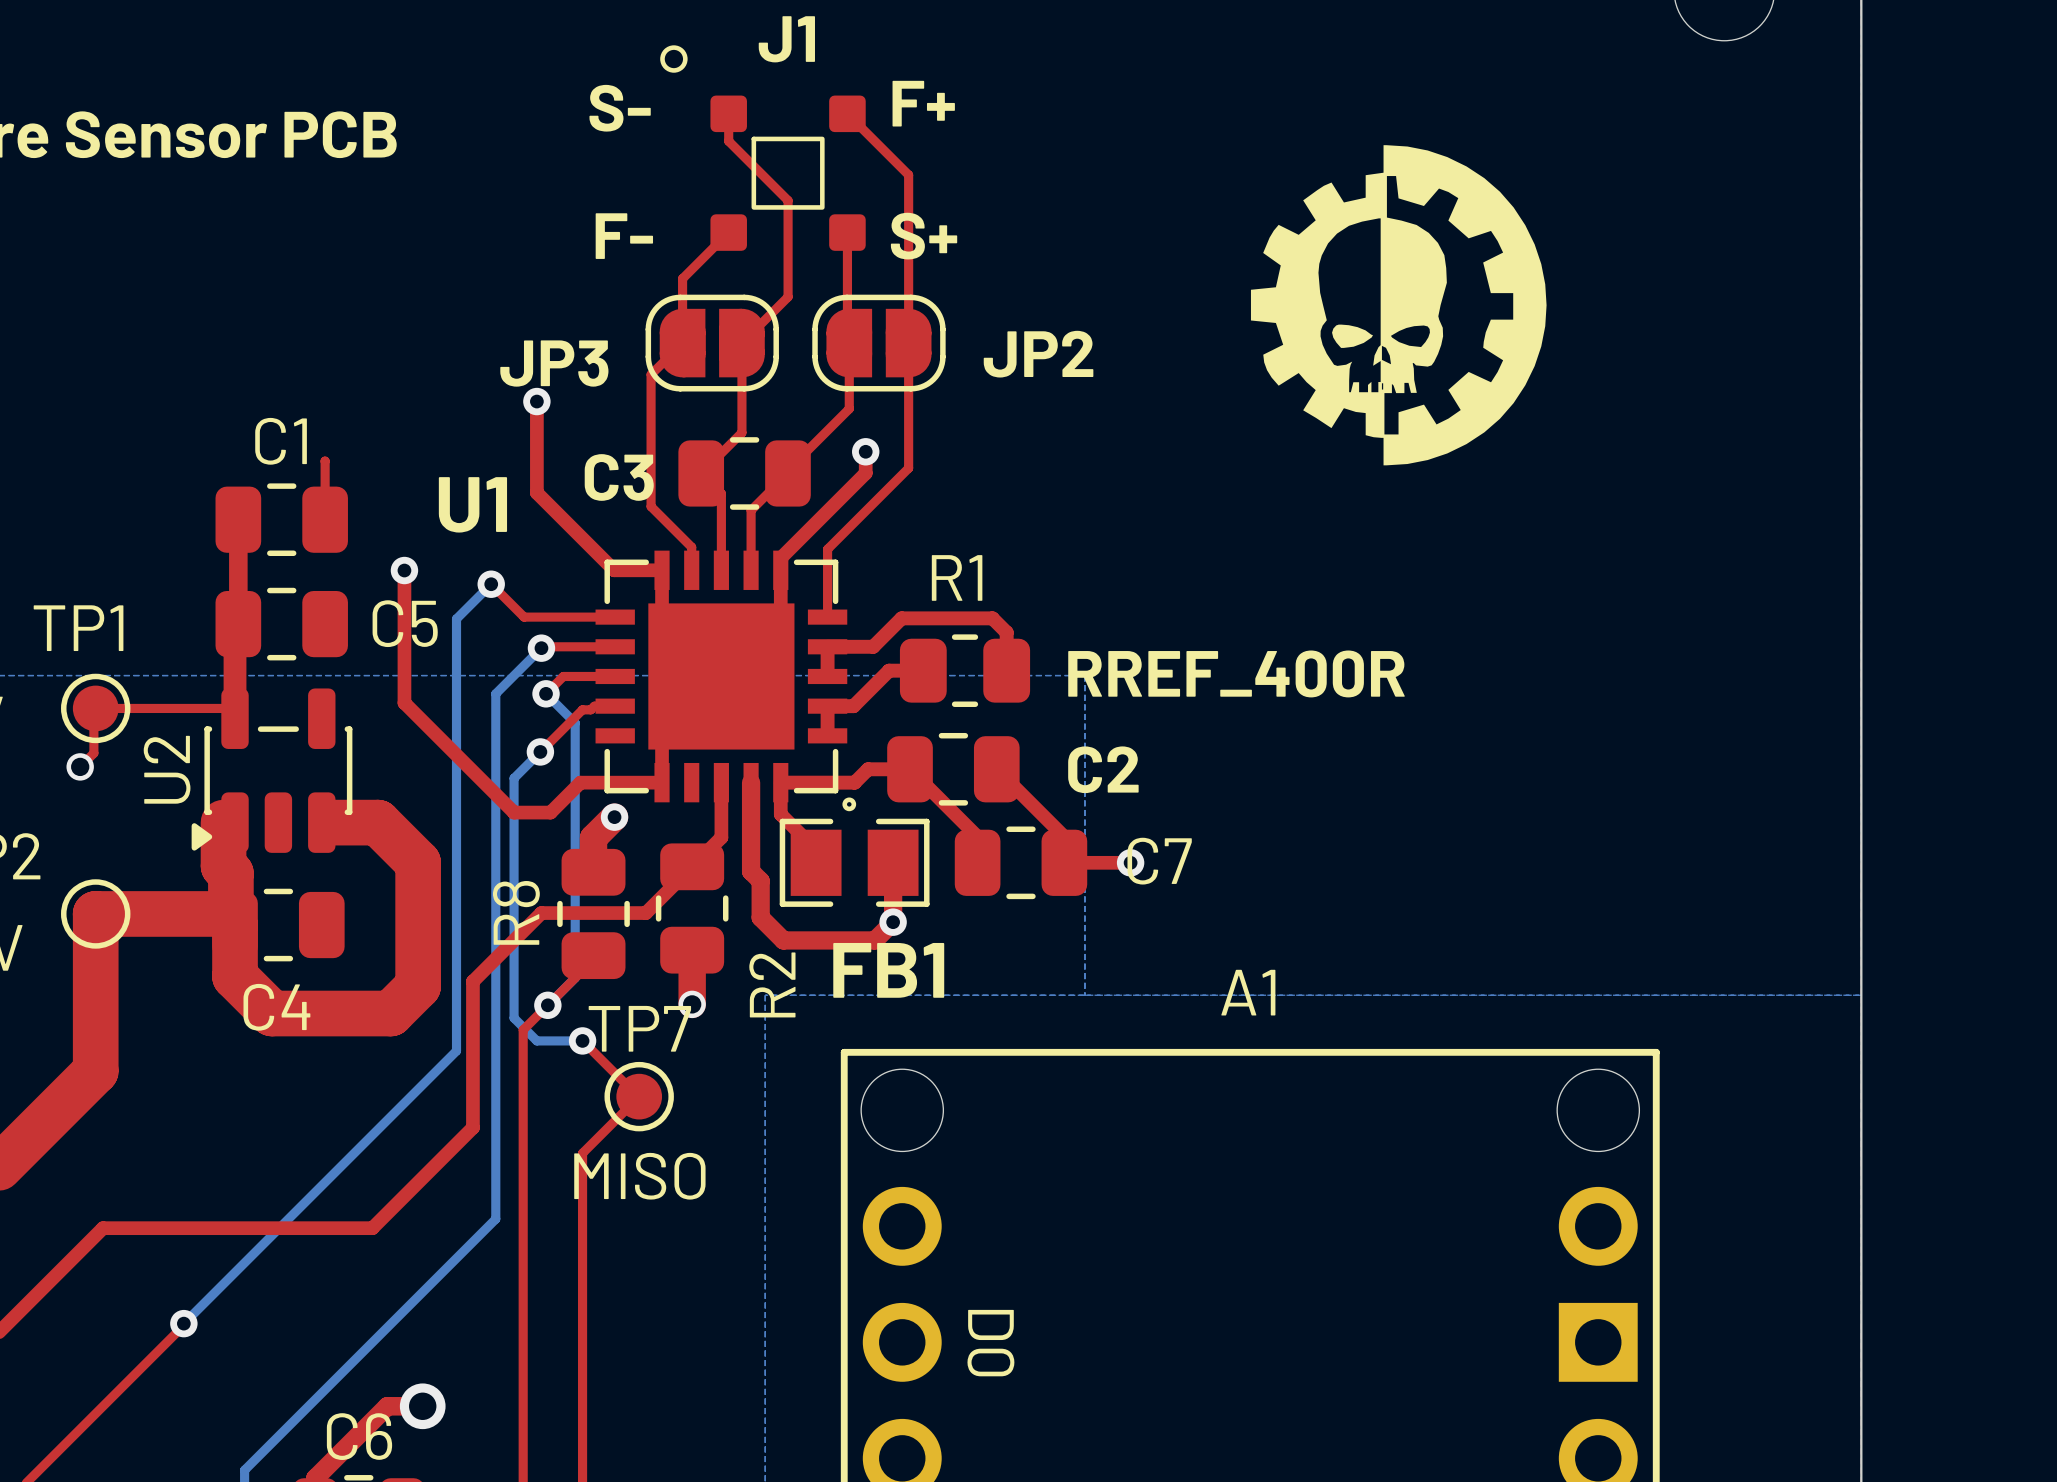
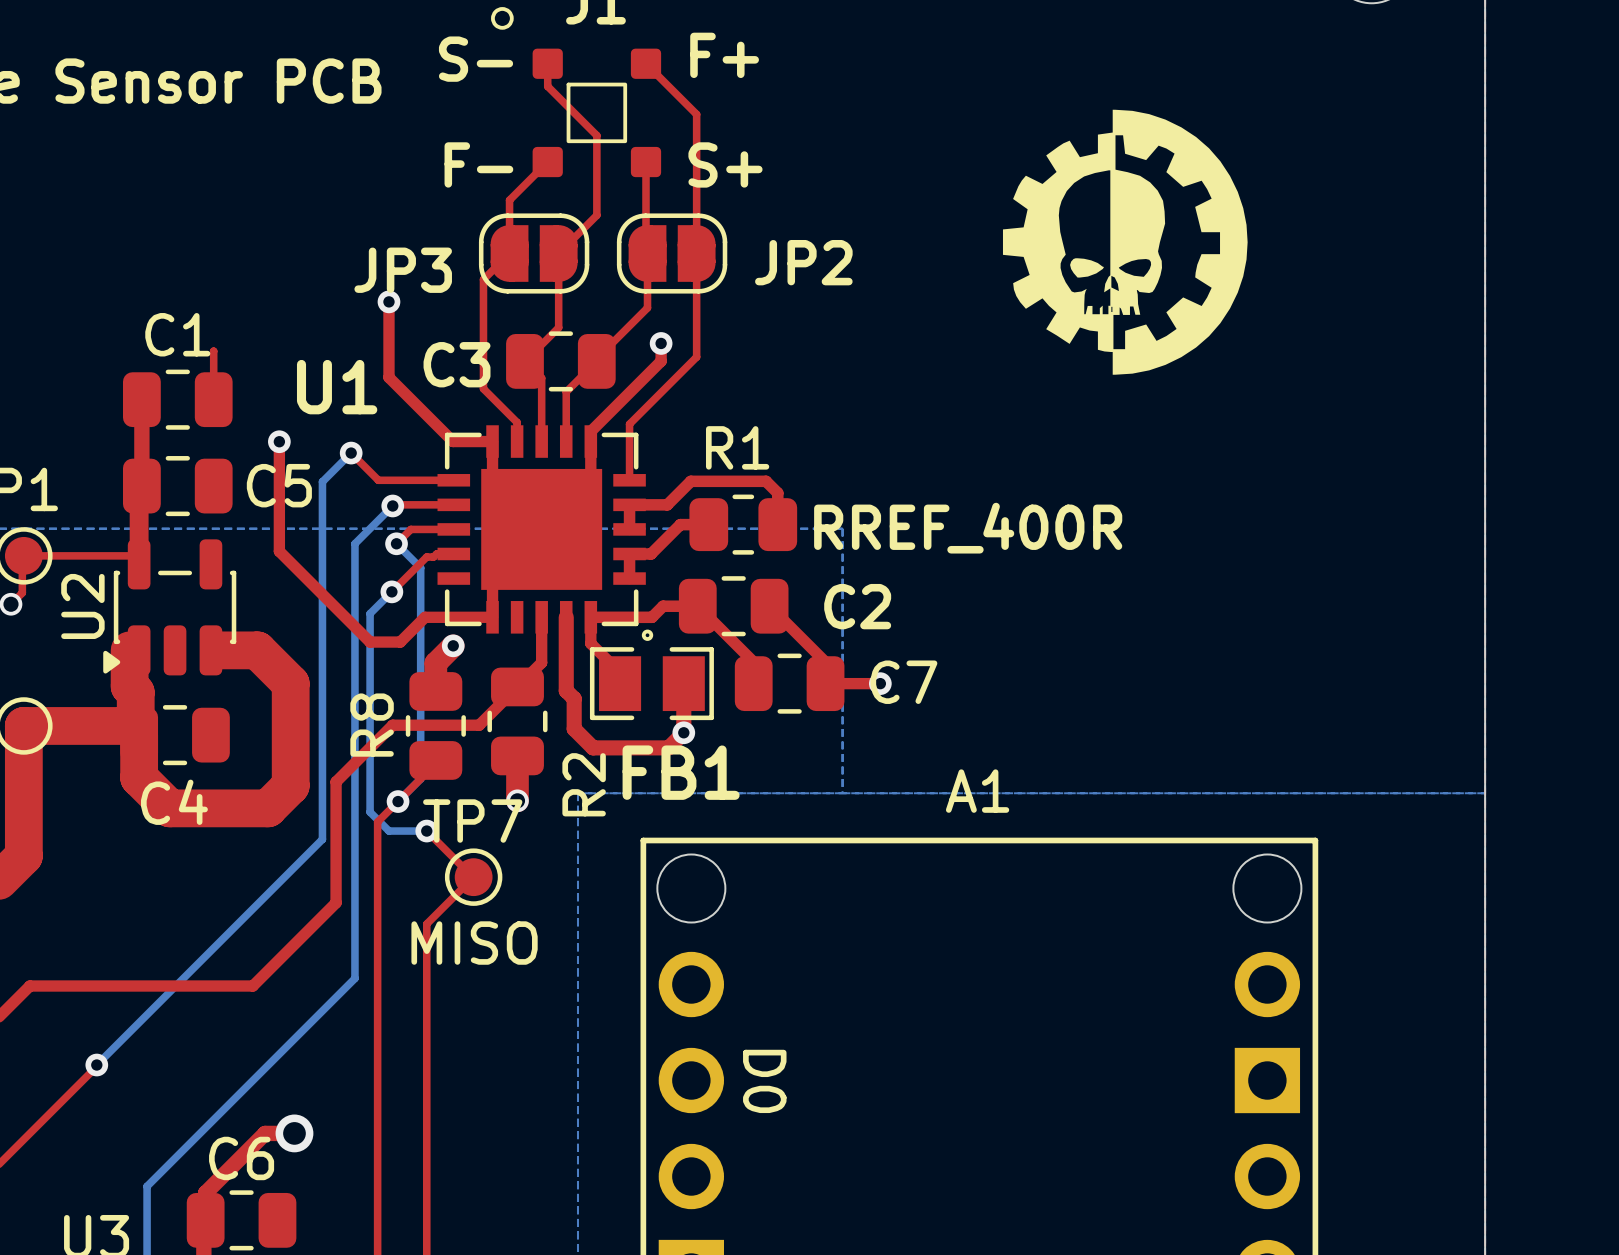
drawing position: (1398, 305) -> (1125, 242)
drawing position: (1352, 336) -> (1087, 267)

